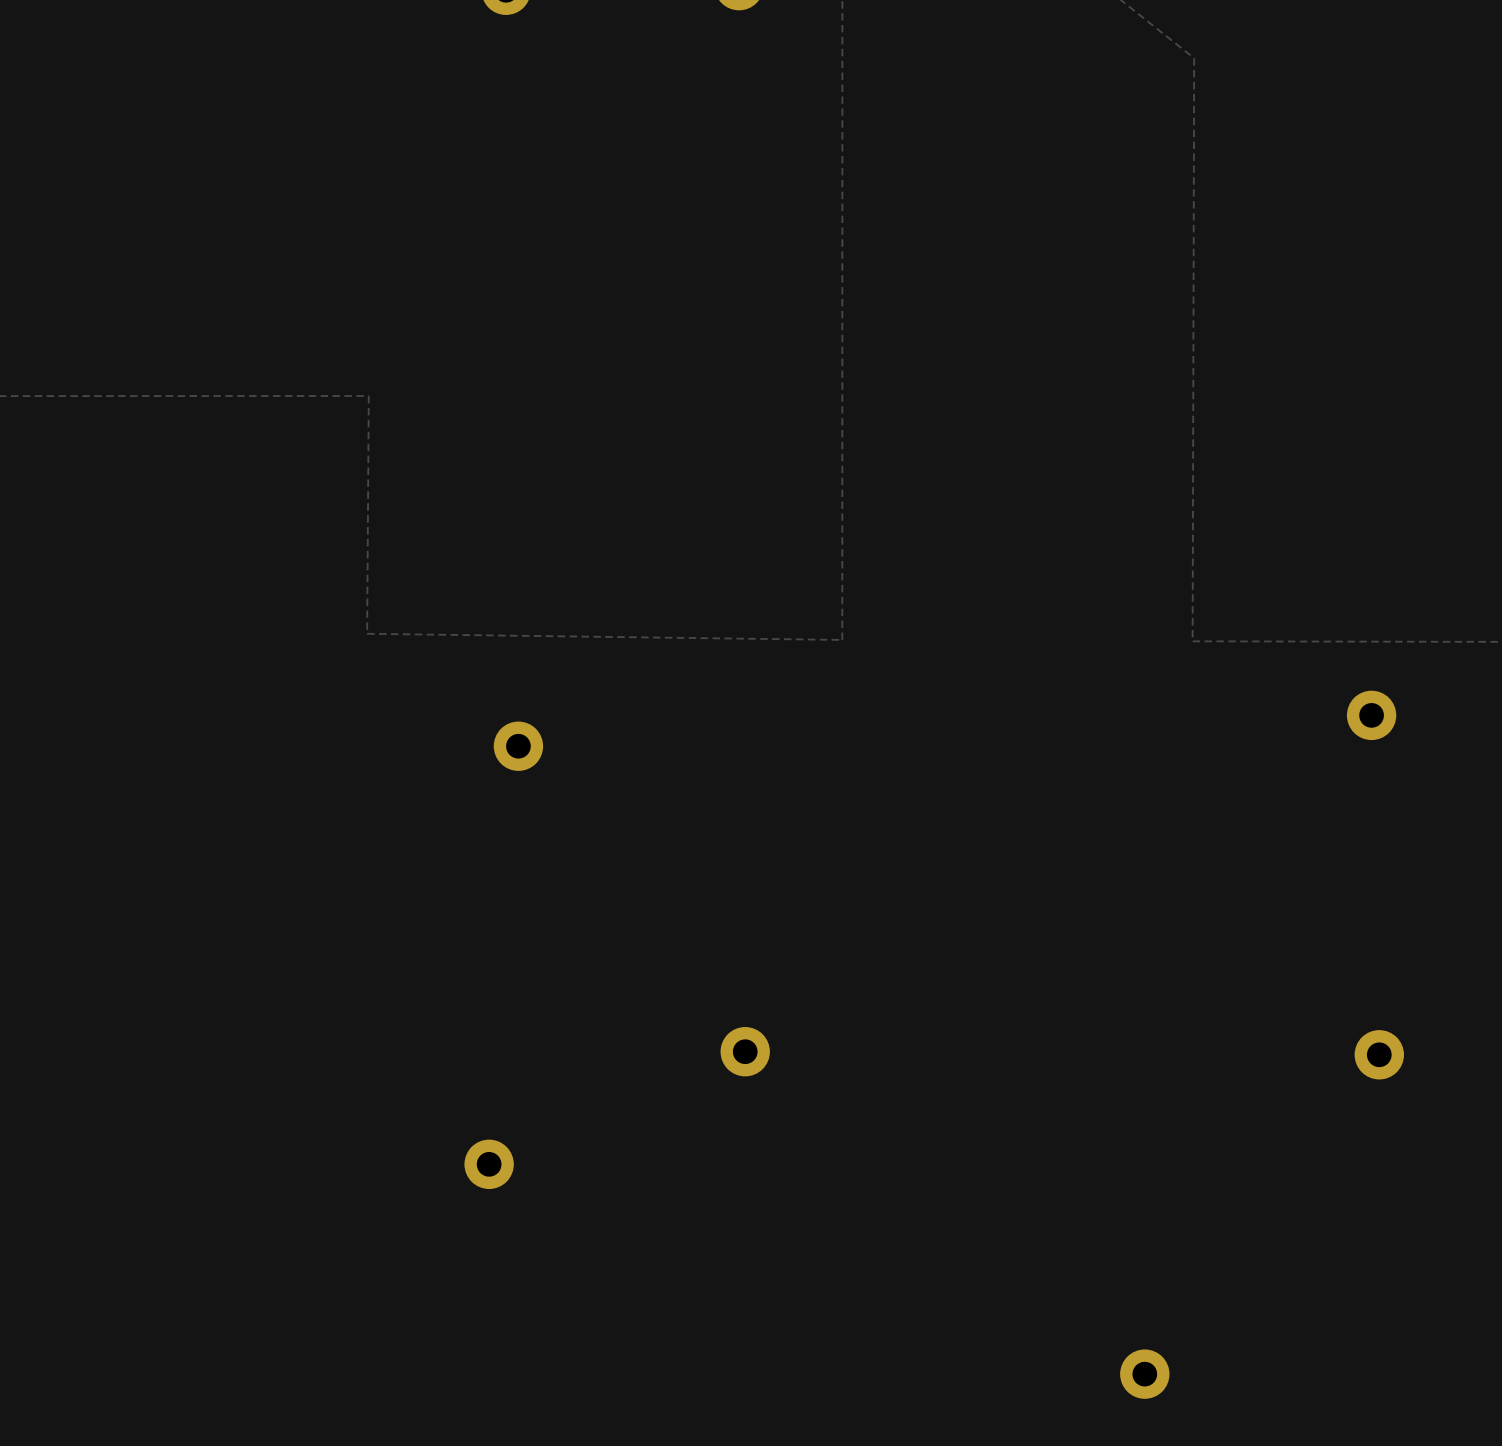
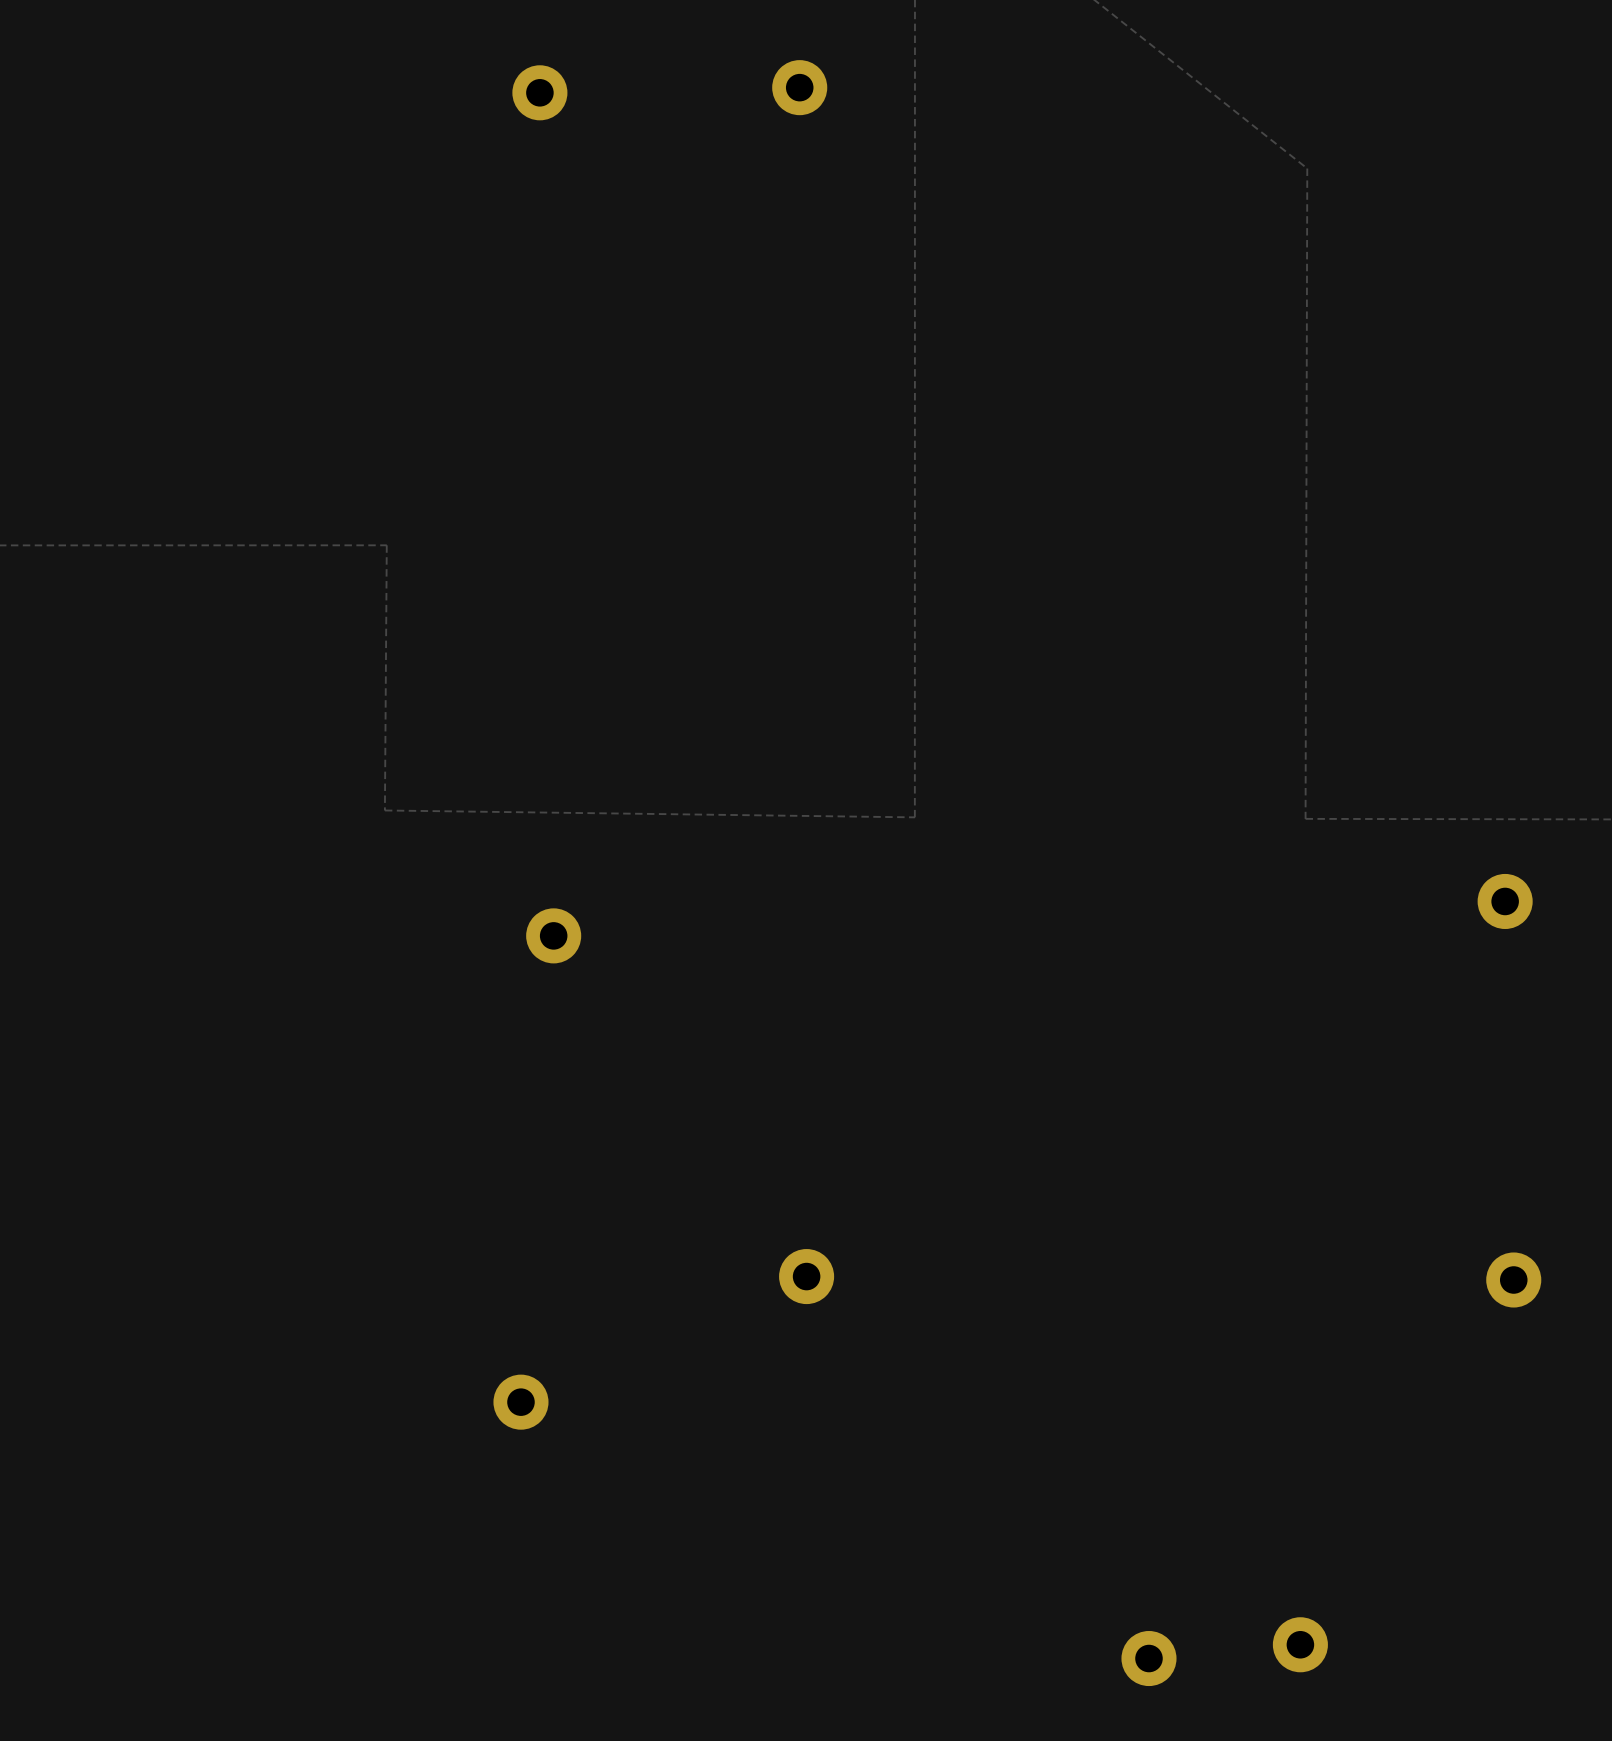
via position: (1144, 1374) -> (1300, 1644)
via: none -> (1148, 1658)

